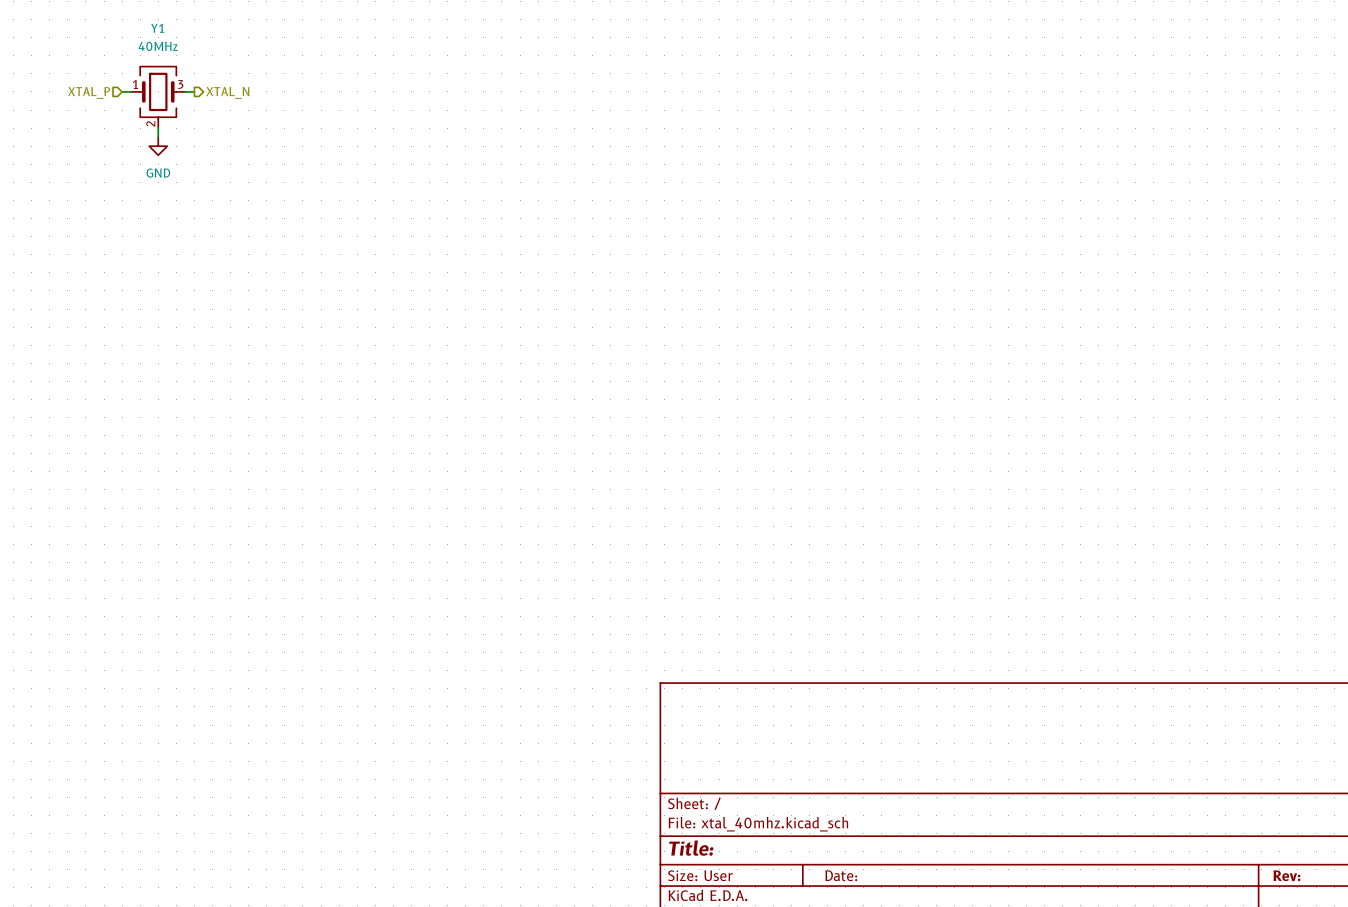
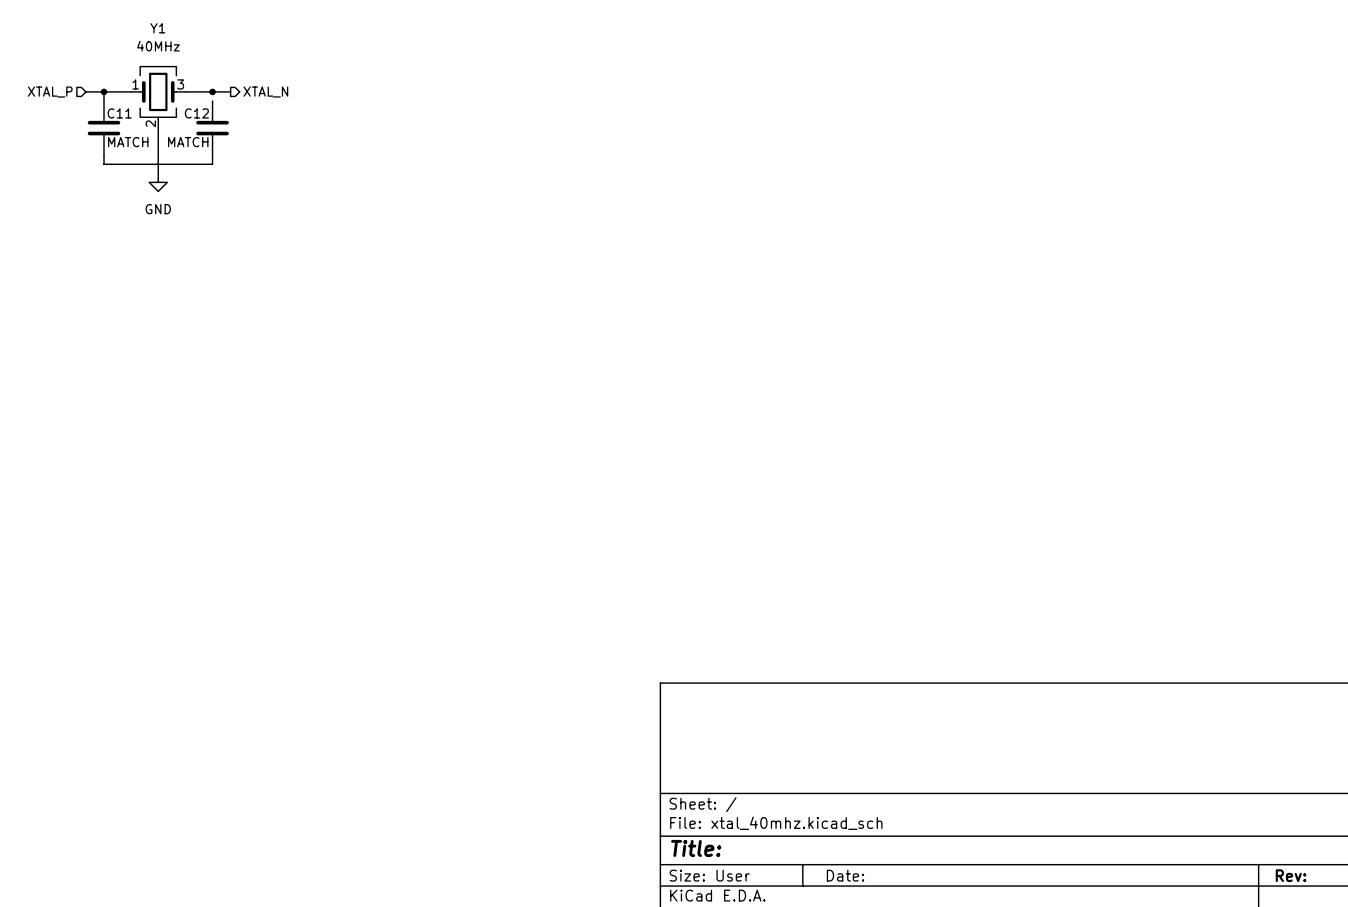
wire: none -> (85, 91) (122, 91)
wire: none -> (104, 91) (104, 100)
junction: none -> (104, 91)
wire: none -> (194, 91) (230, 91)
junction: none -> (212, 91)
hierarchical label position: XTAL_P (89, 92) -> XTAL_P (50, 92)
hierarchical label position: XTAL_N (227, 92) -> XTAL_N (265, 92)
C11: none -> MATCH (104, 128)
C12: none -> MATCH (212, 128)
wire: none -> (158, 137) (158, 173)
power symbol position: GND (158, 146) -> GND (158, 182)
wire: none -> (104, 155) (104, 164) (212, 164) (212, 155)

